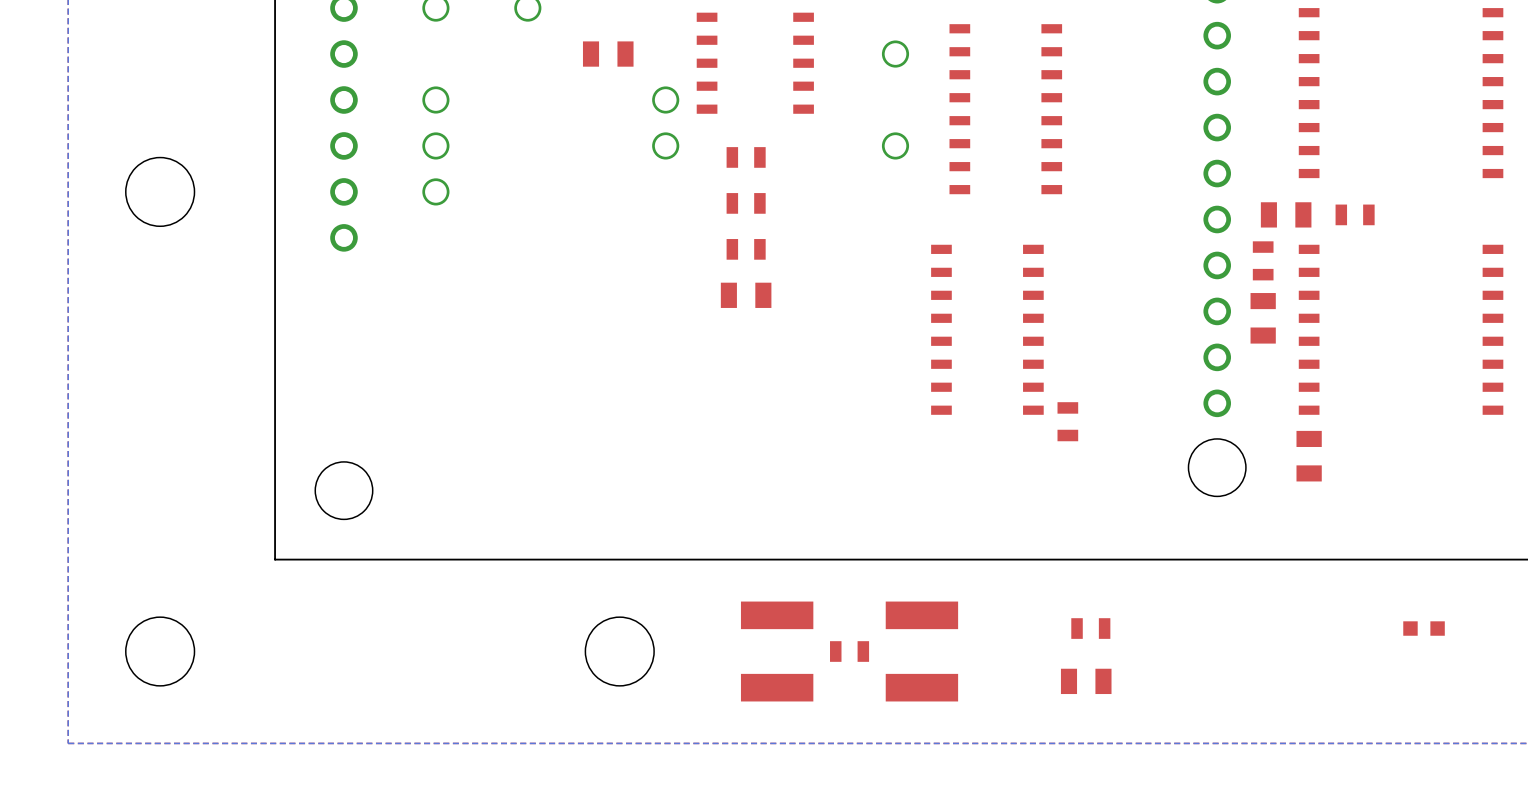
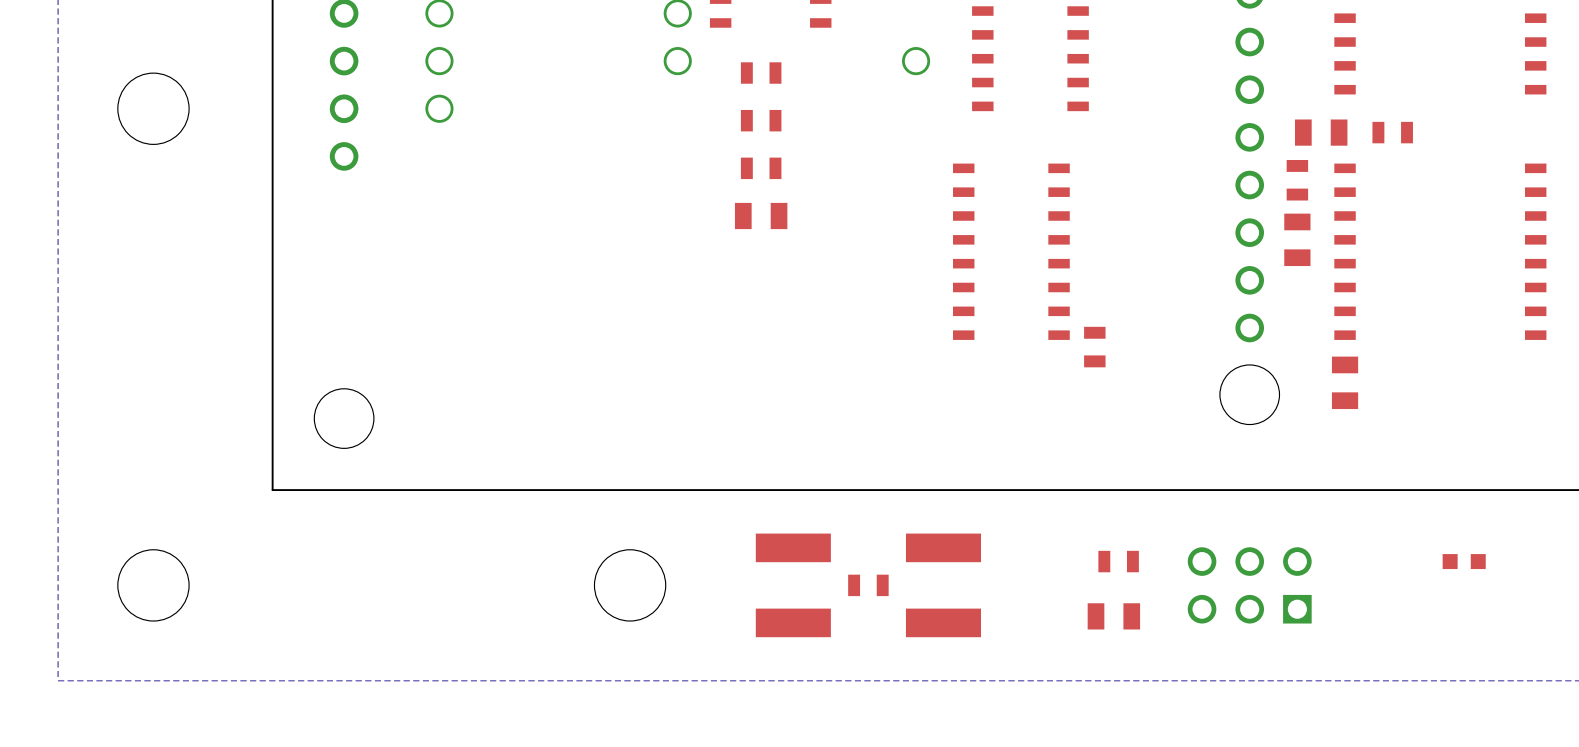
part: none -> (1249, 585)

